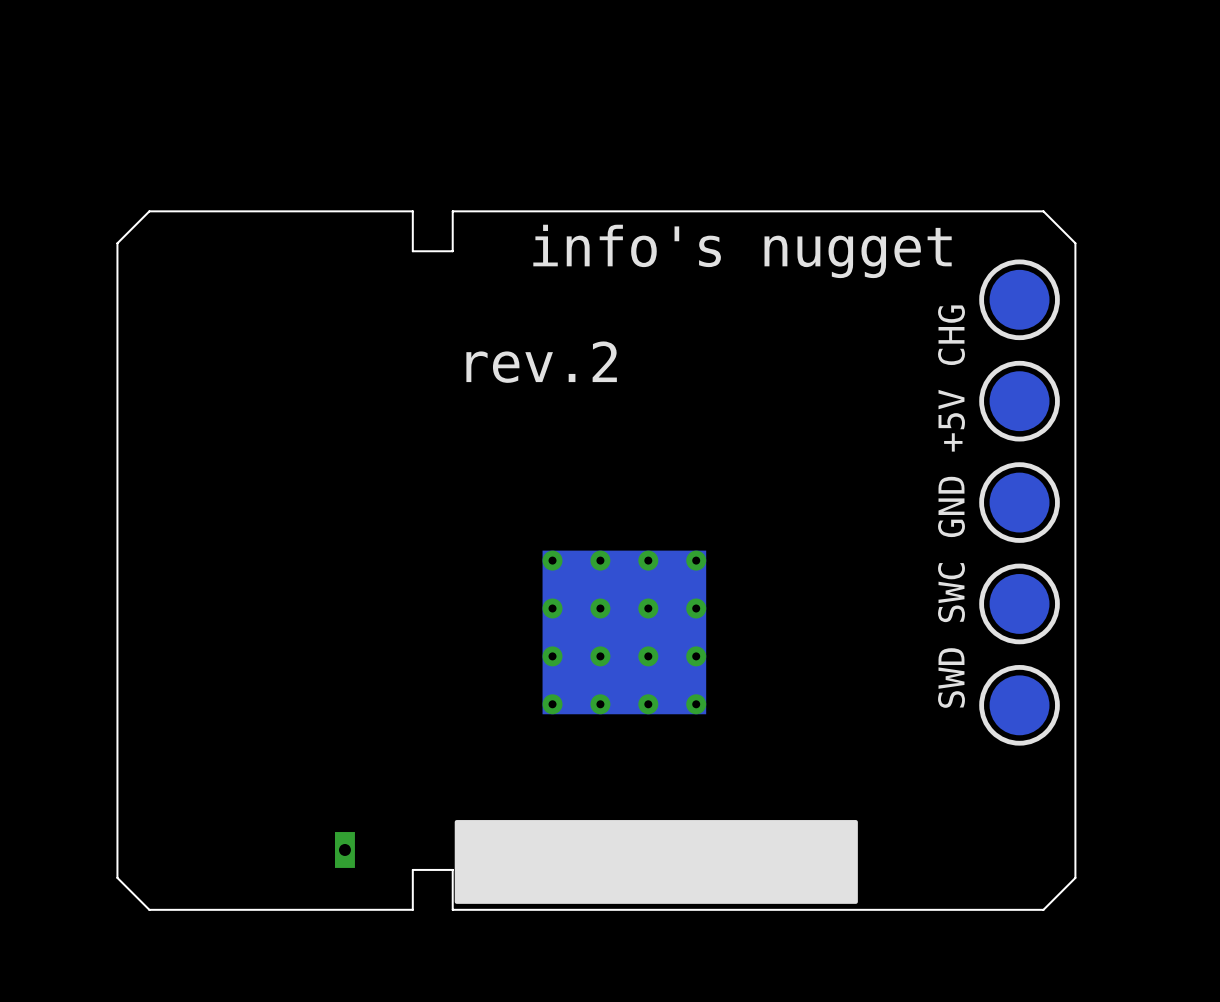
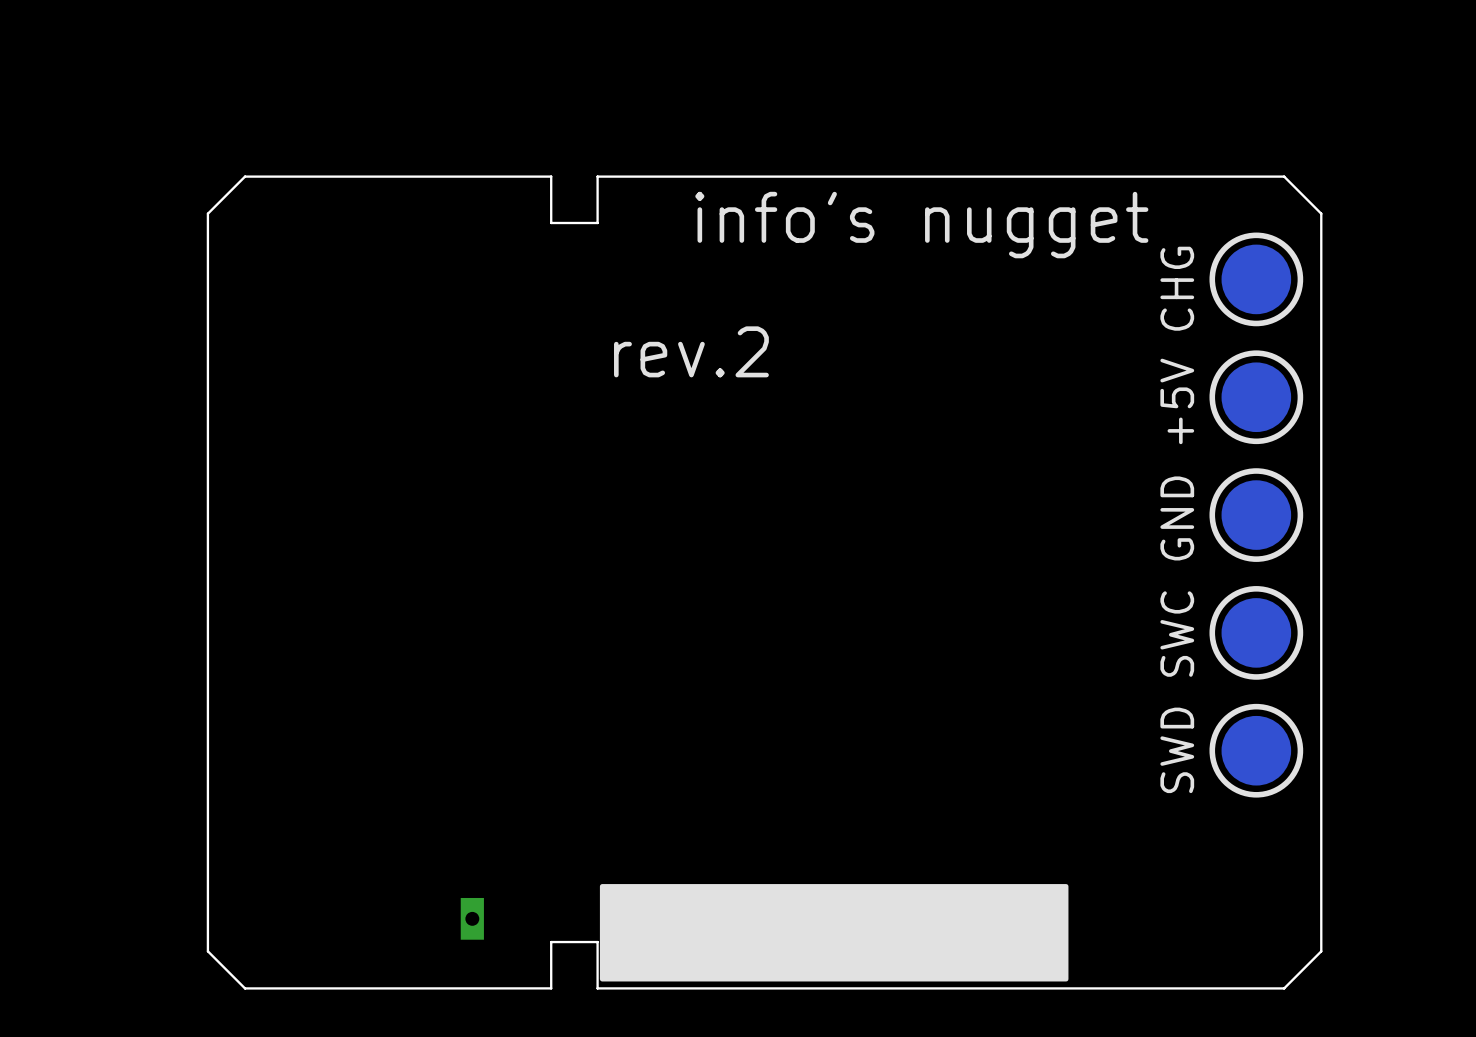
part: (624, 632) -> none

